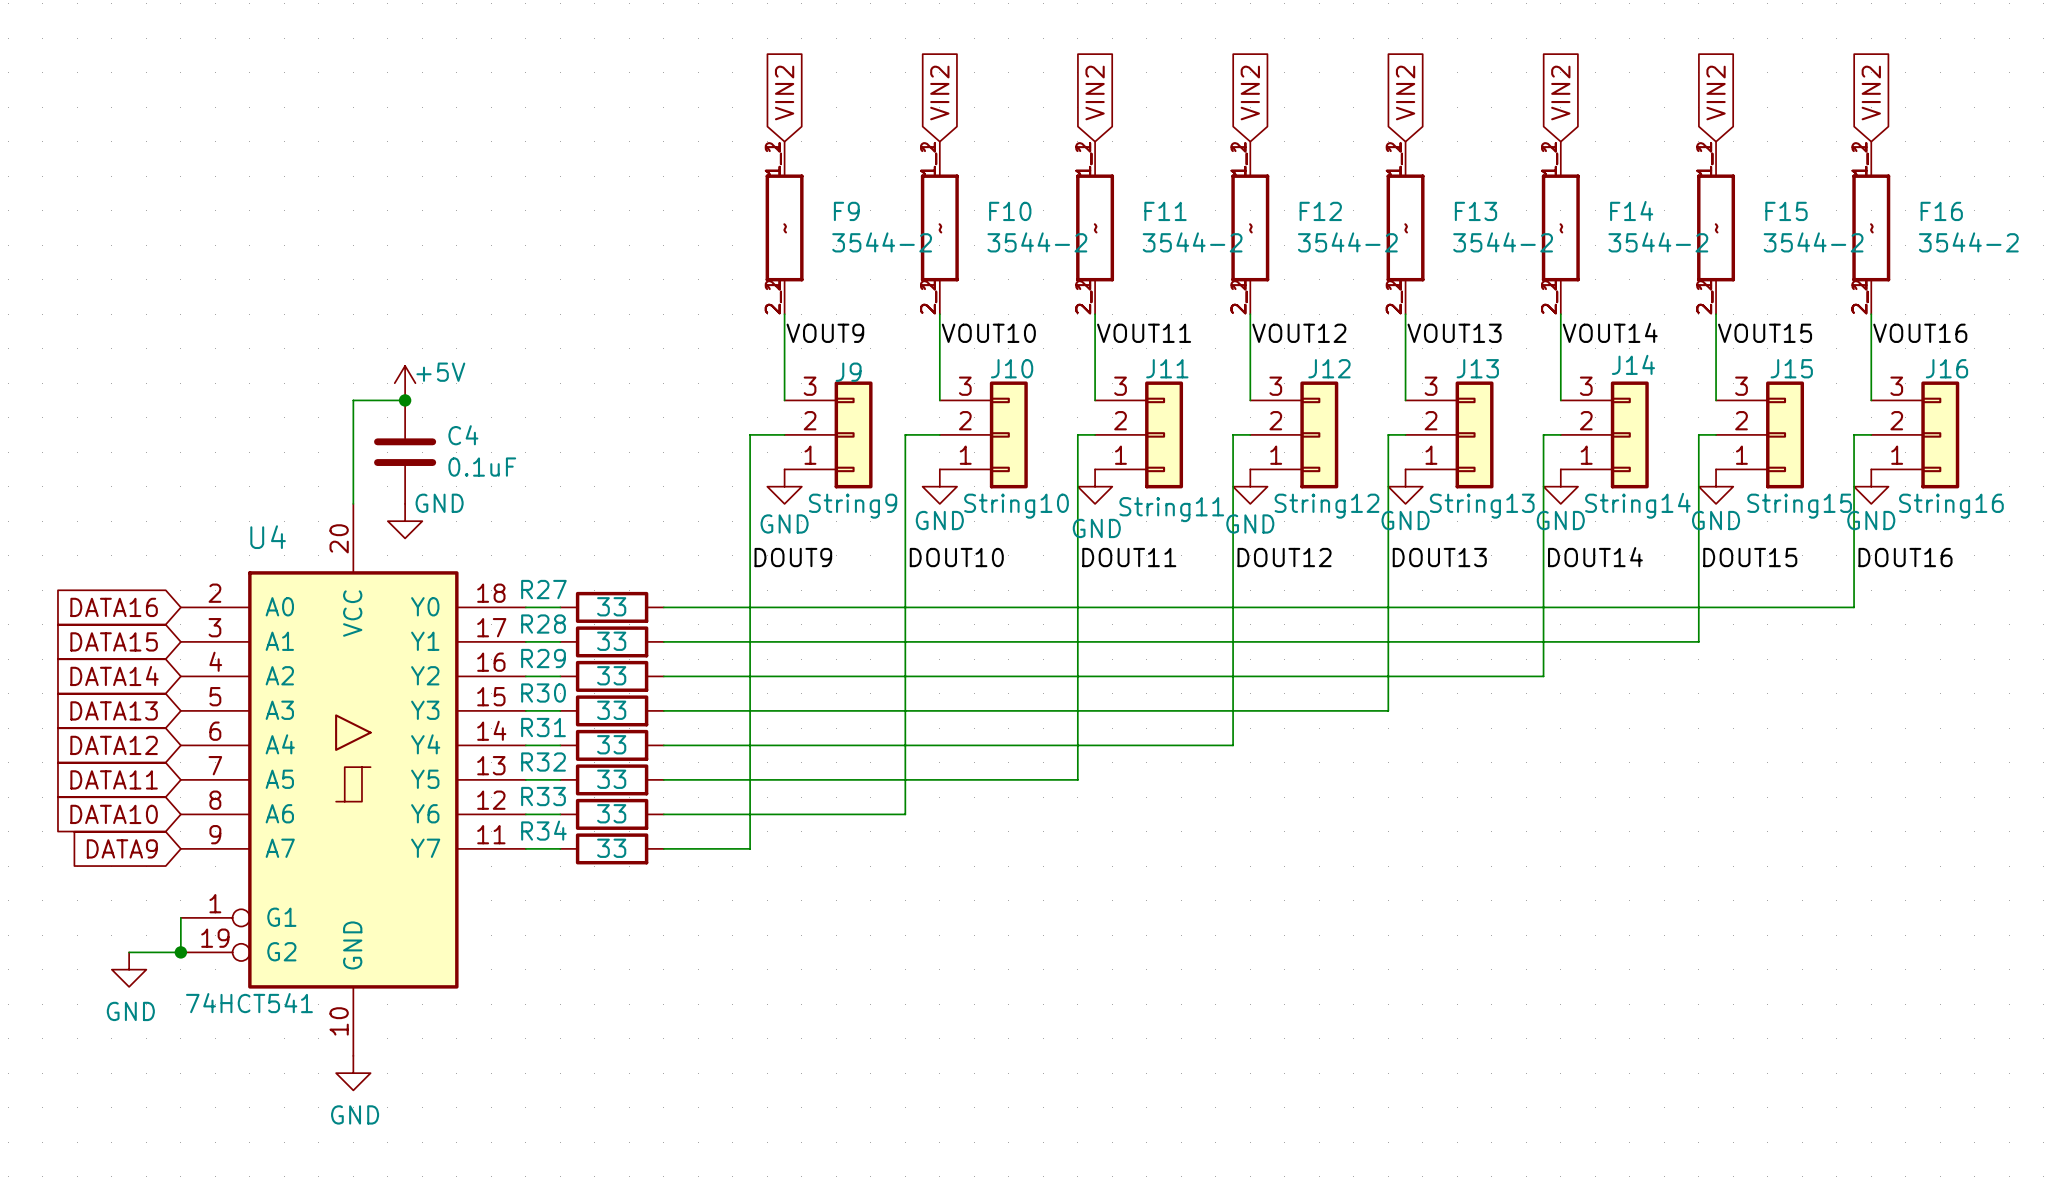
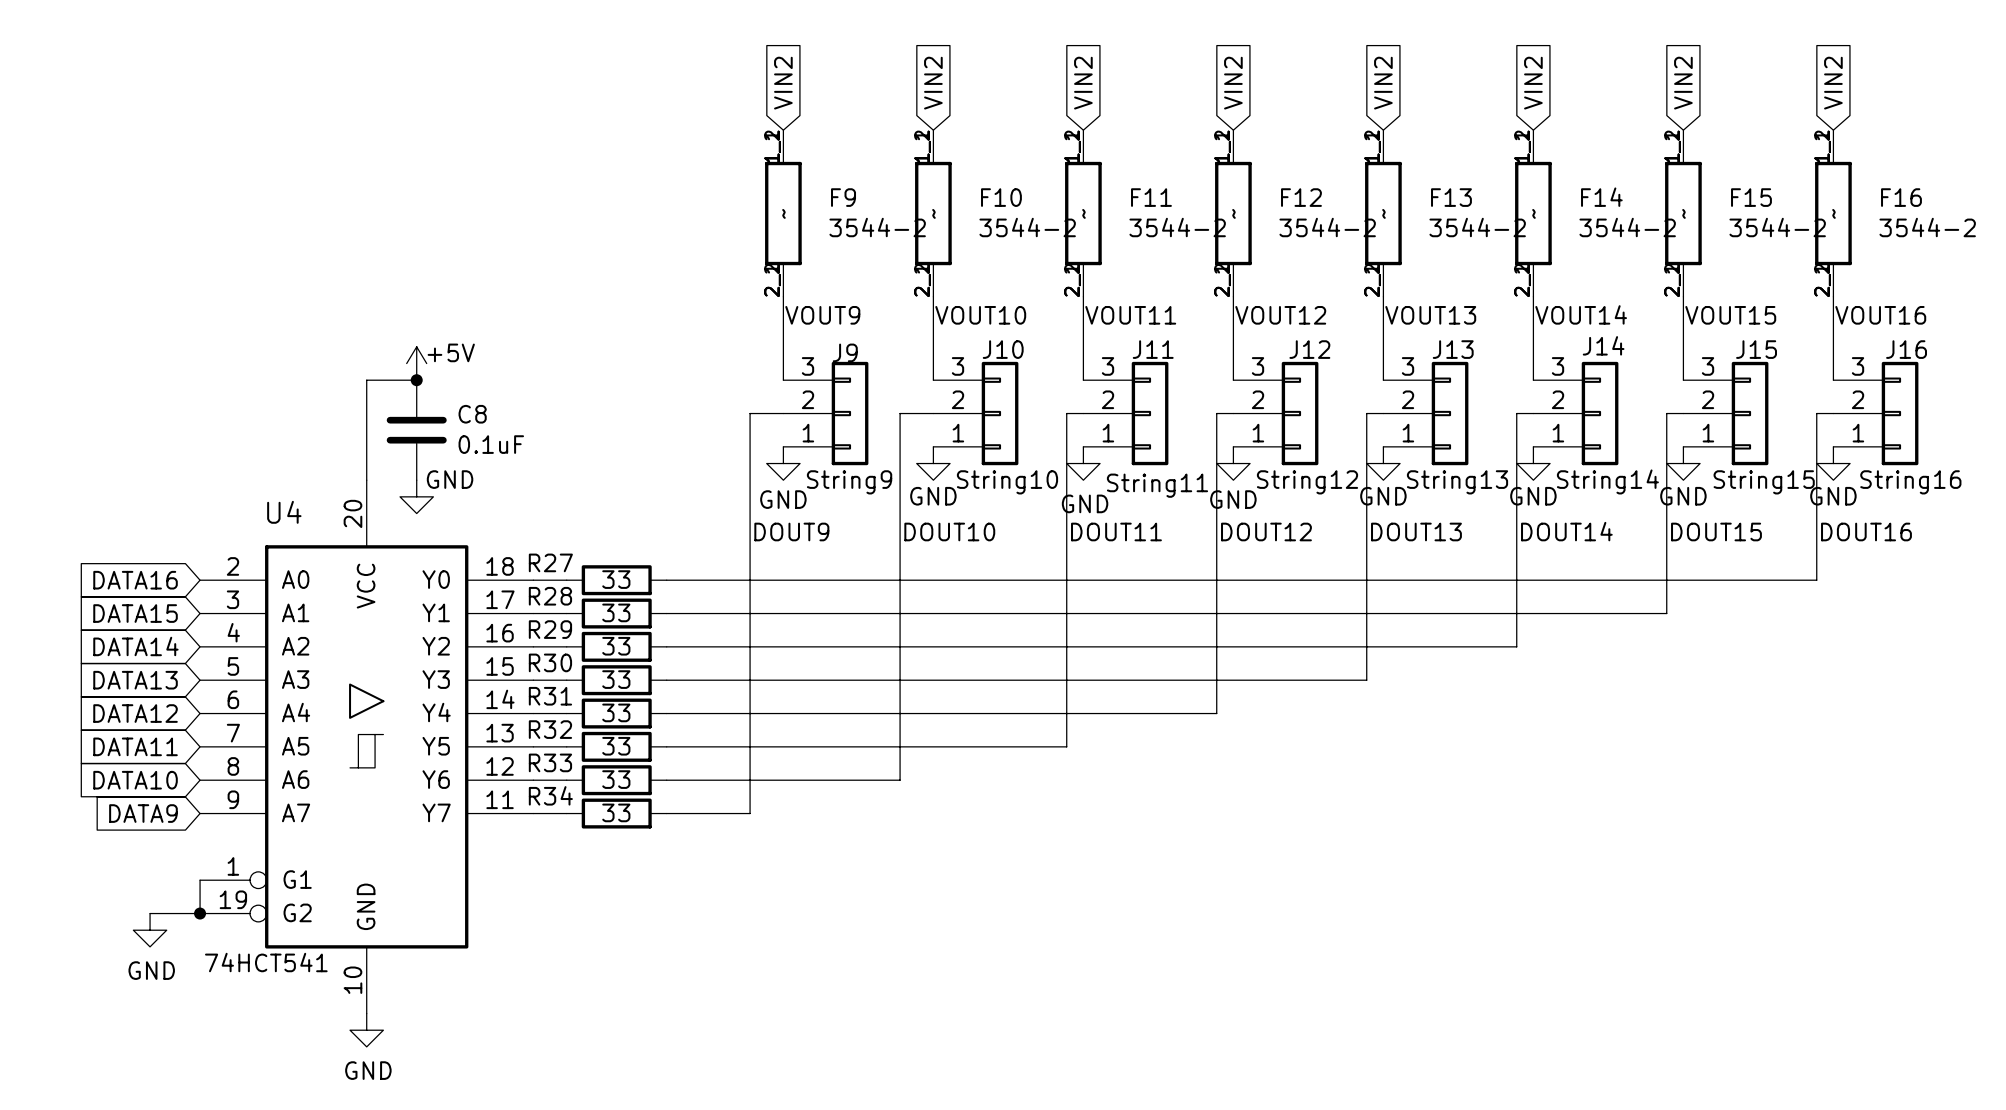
C4 name: C4 (463, 435) -> C8 (472, 414)

